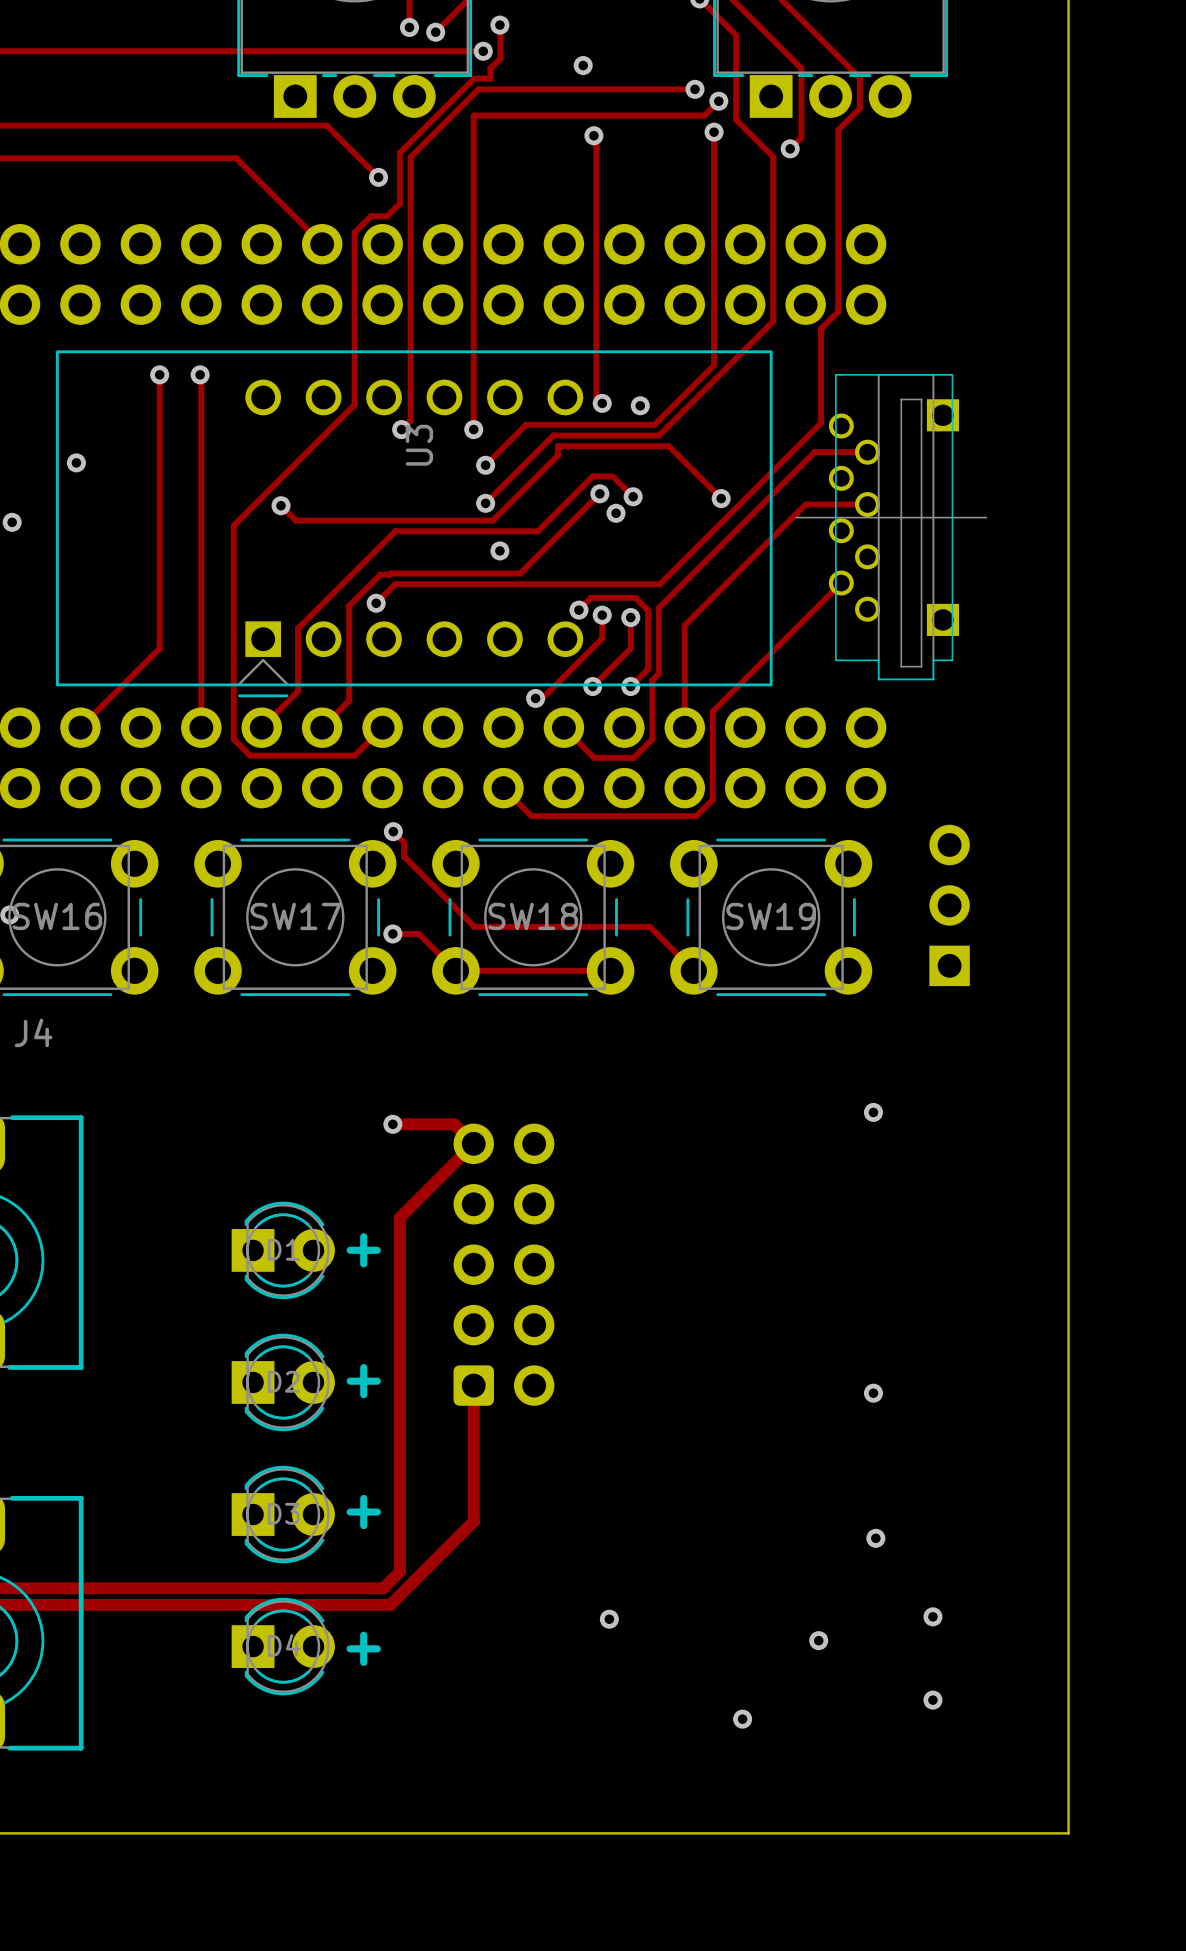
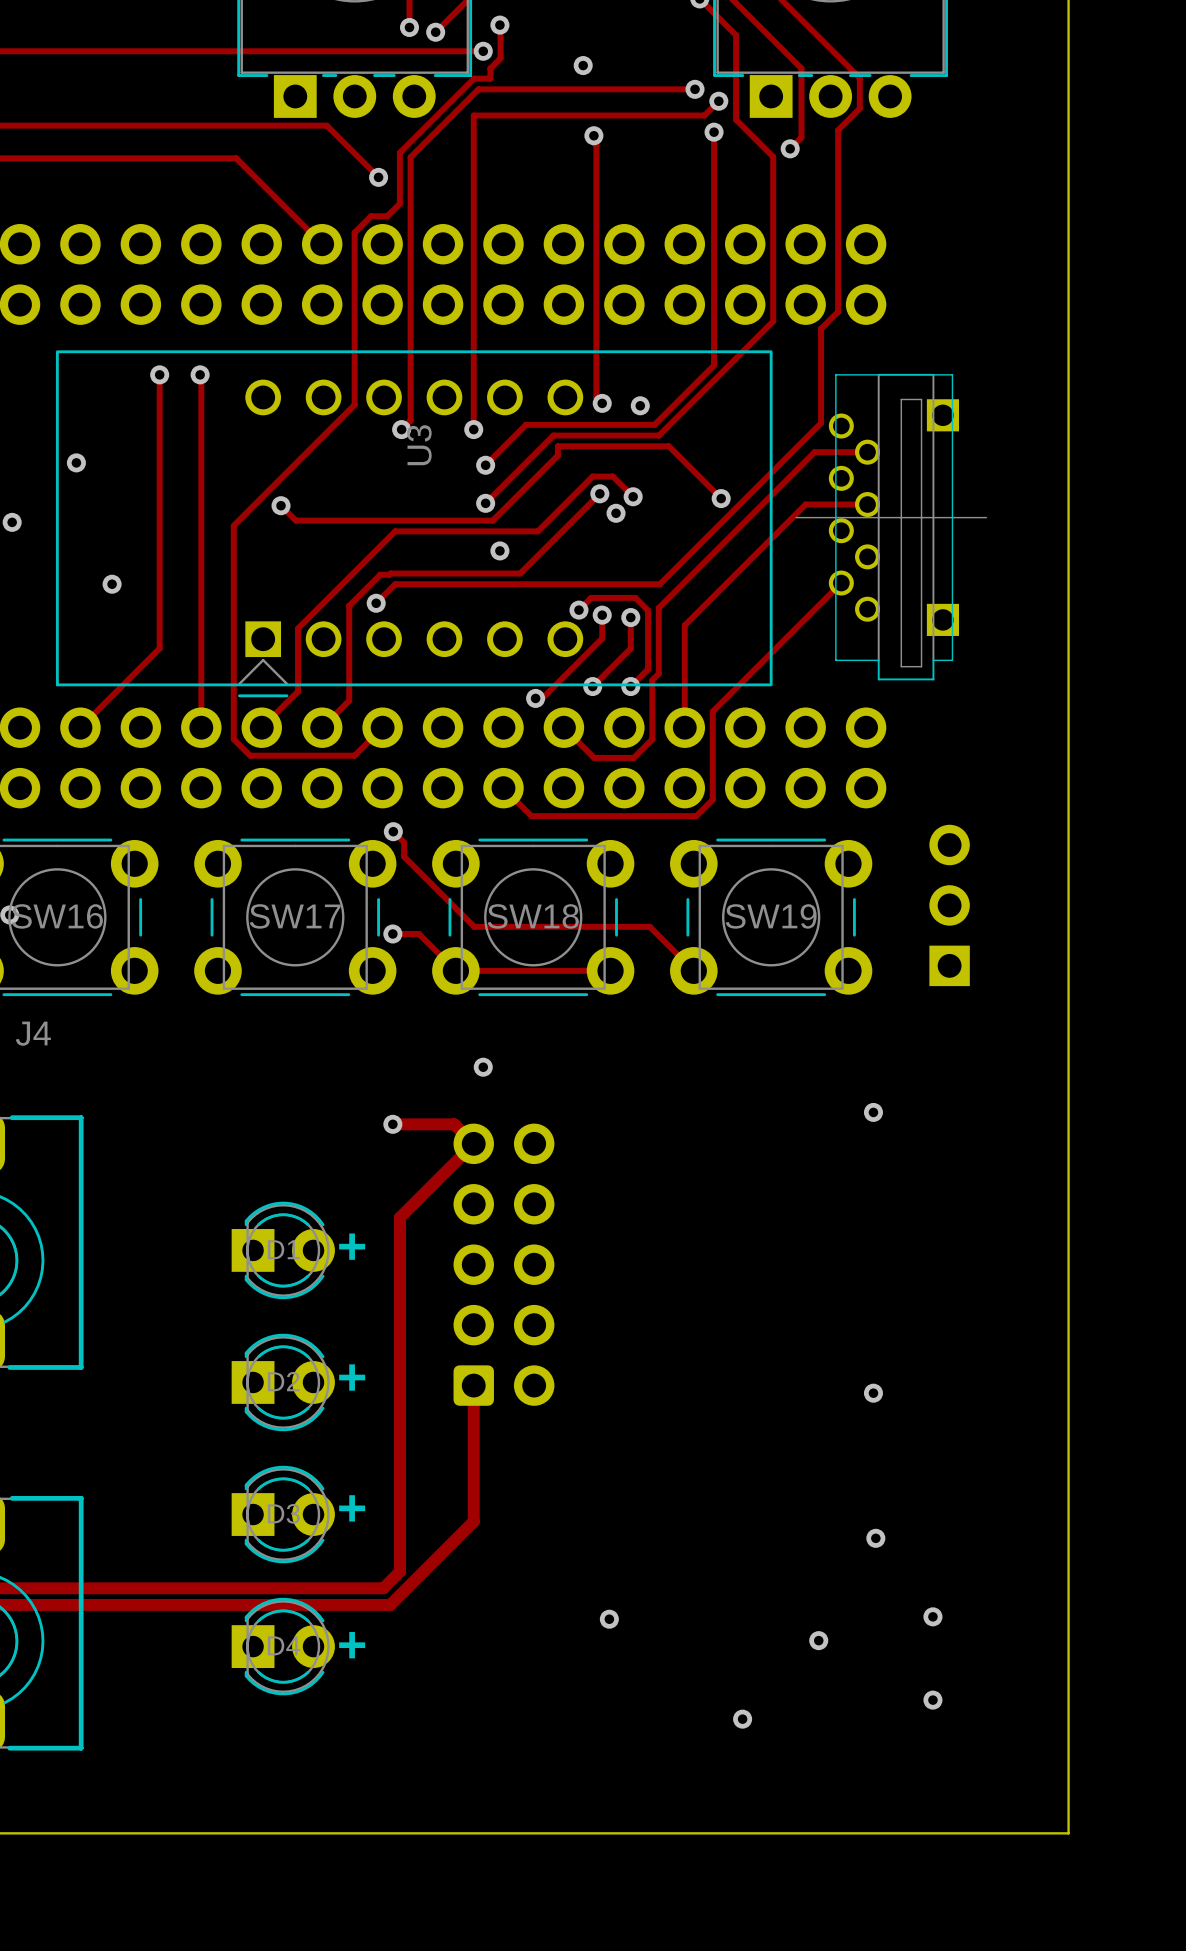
via: none -> (112, 584)
via: none -> (483, 1067)

